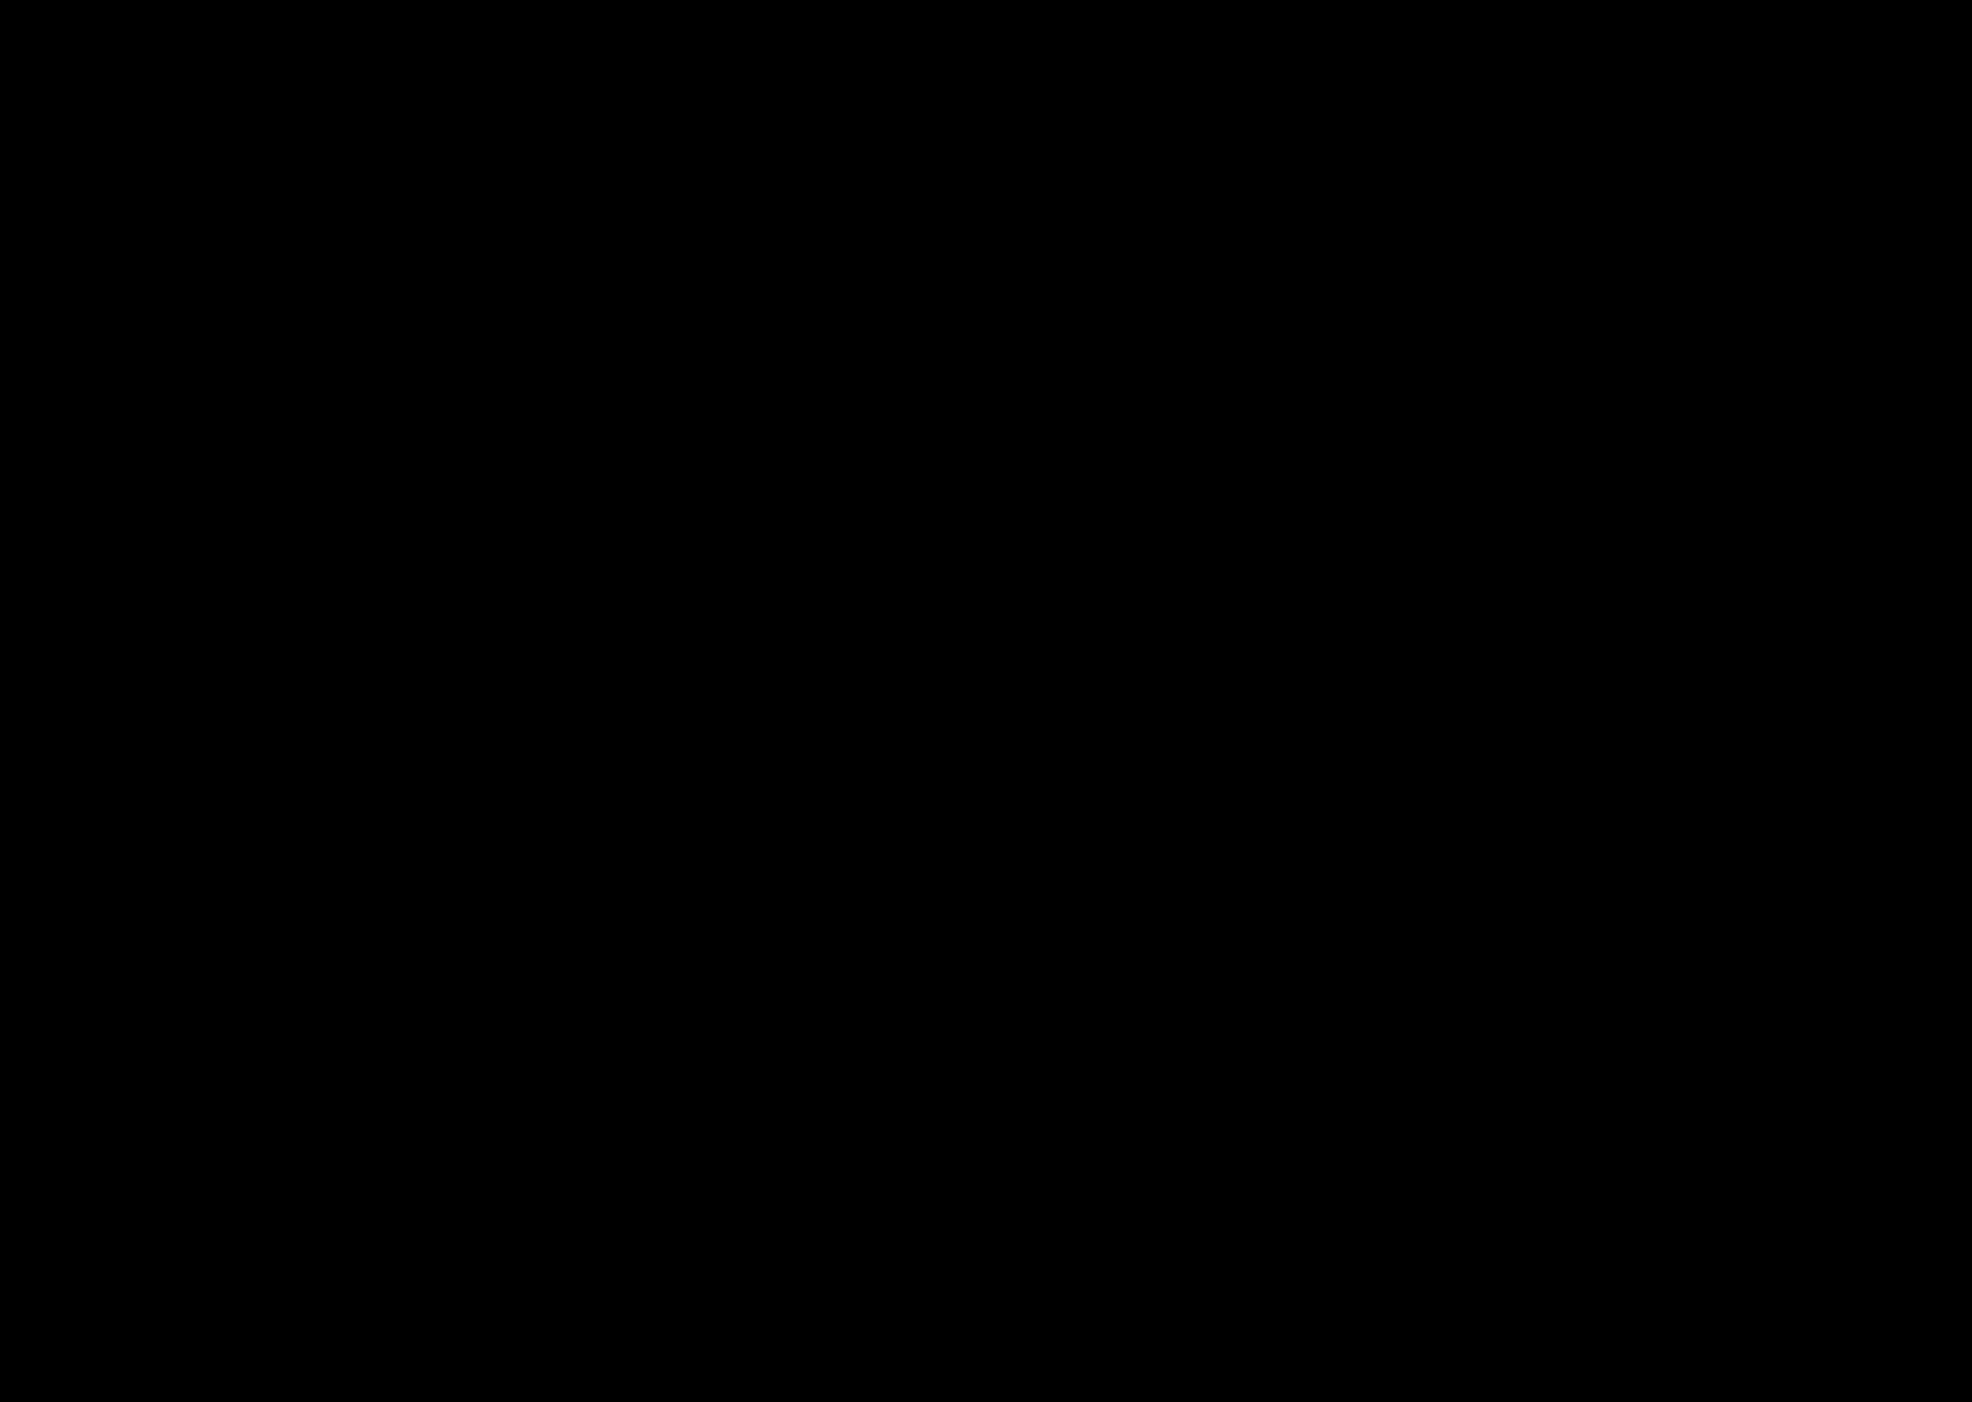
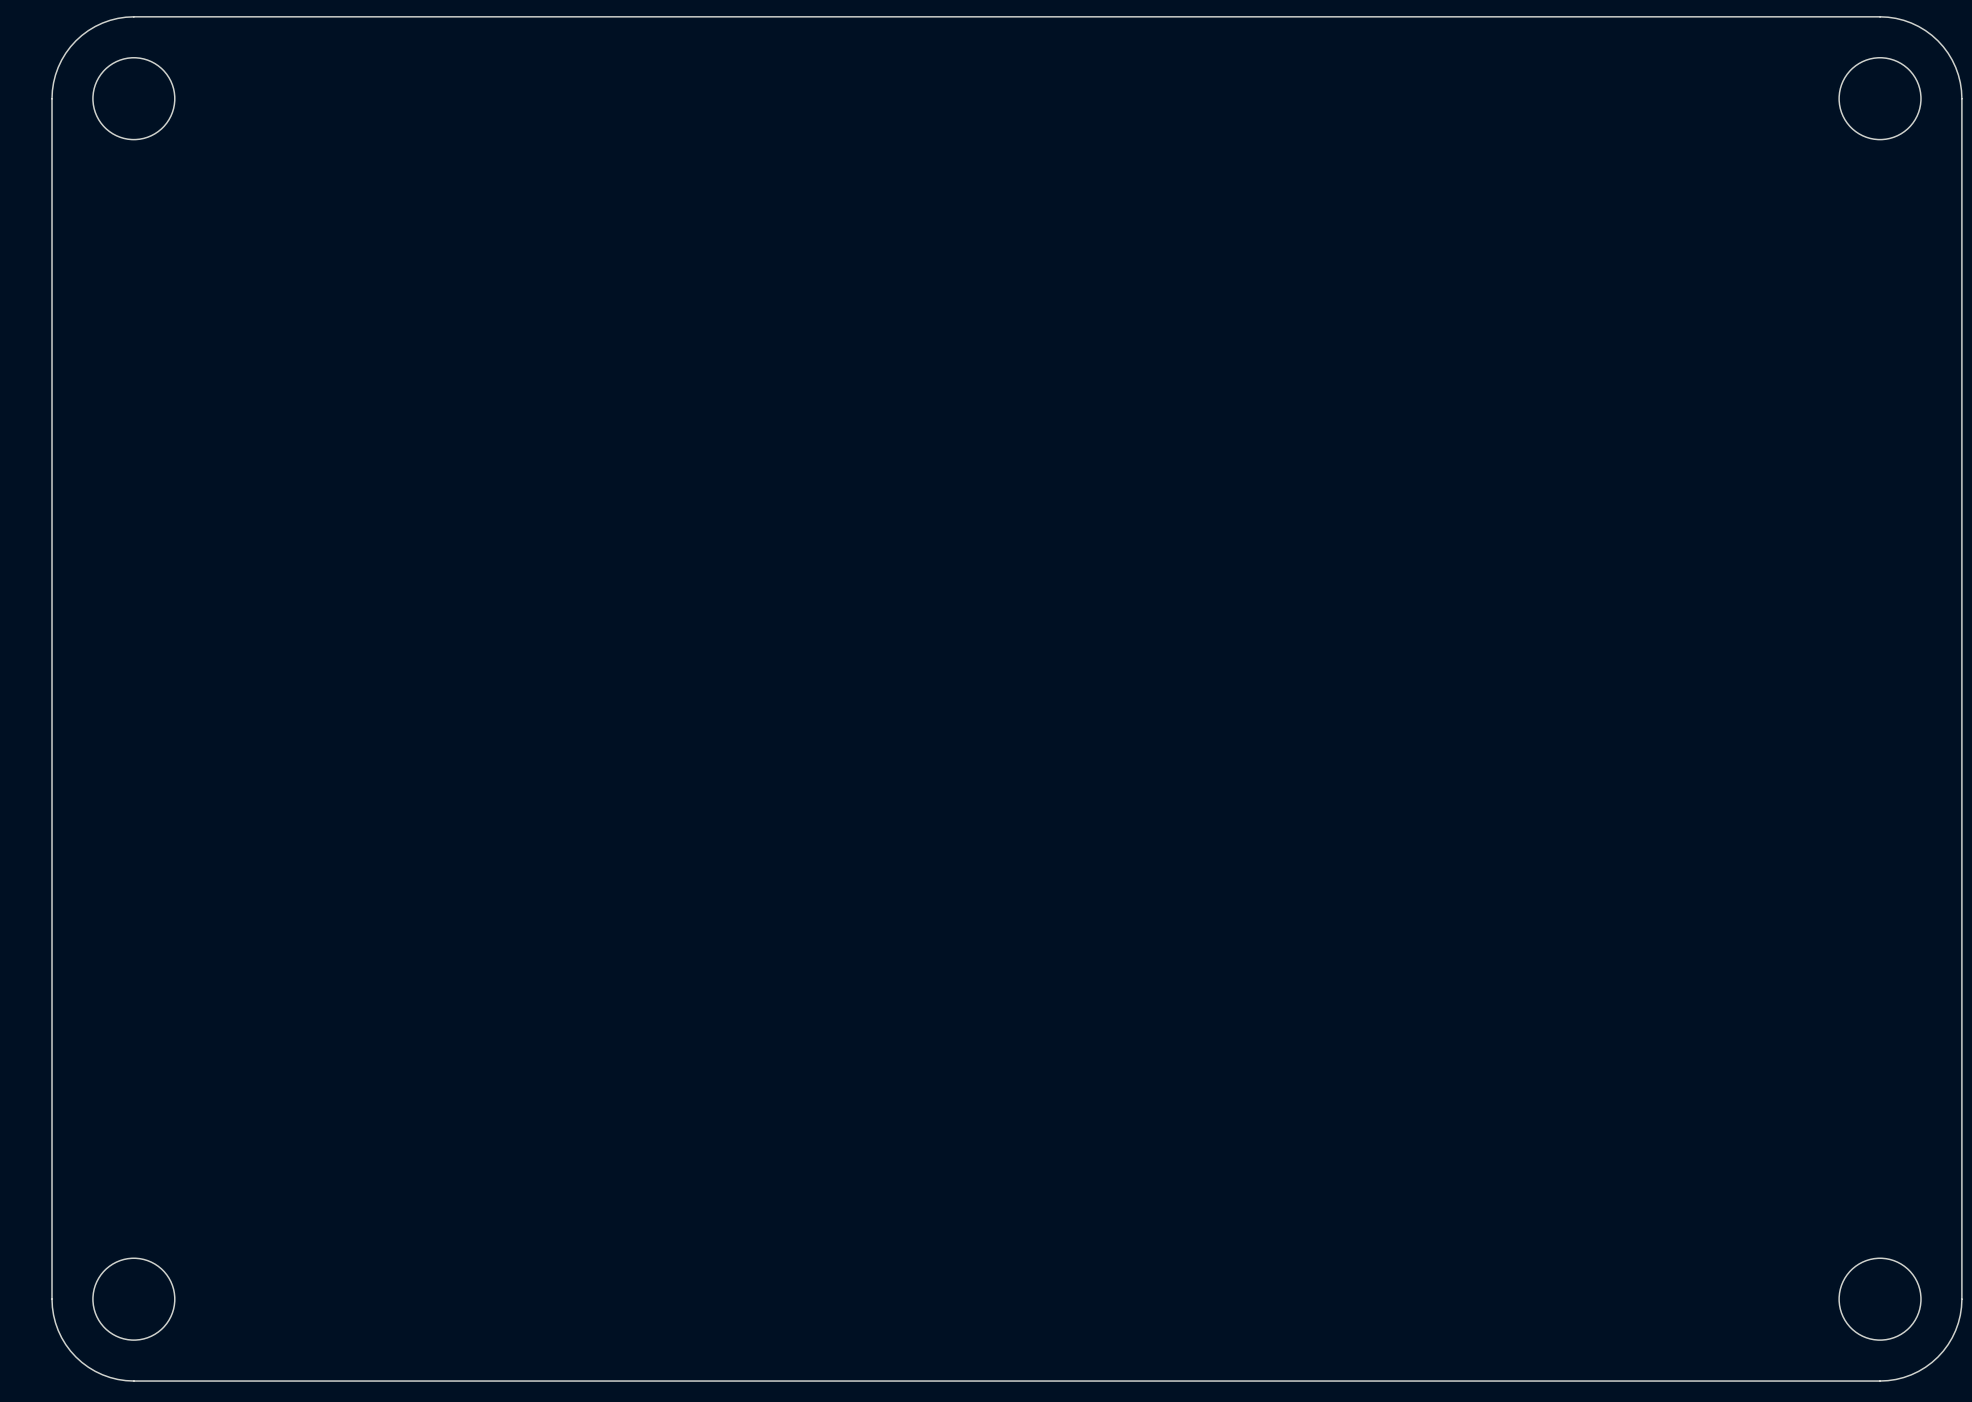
board edge: none -> (133, 16) (1880, 16) (1903, 20) (1925, 30) (1937, 40) (1952, 60) (1958, 74) (1961, 98) (1961, 1299) (1958, 1322) (1948, 1344) (1931, 1362) (1918, 1371) (1896, 1379) (1880, 1381) (133, 1381) (110, 1377) (88, 1367) (75, 1357) (61, 1337) (53, 1315) (52, 1299) (52, 98) (53, 82) (58, 67) (65, 53) (75, 40) (88, 30) (102, 23) (117, 18) (133, 16)
round board edge: none -> [92, 57, 176, 140]
round board edge: none -> [1838, 57, 1922, 140]
round board edge: none -> [92, 1257, 176, 1341]
round board edge: none -> [1838, 1257, 1922, 1341]

